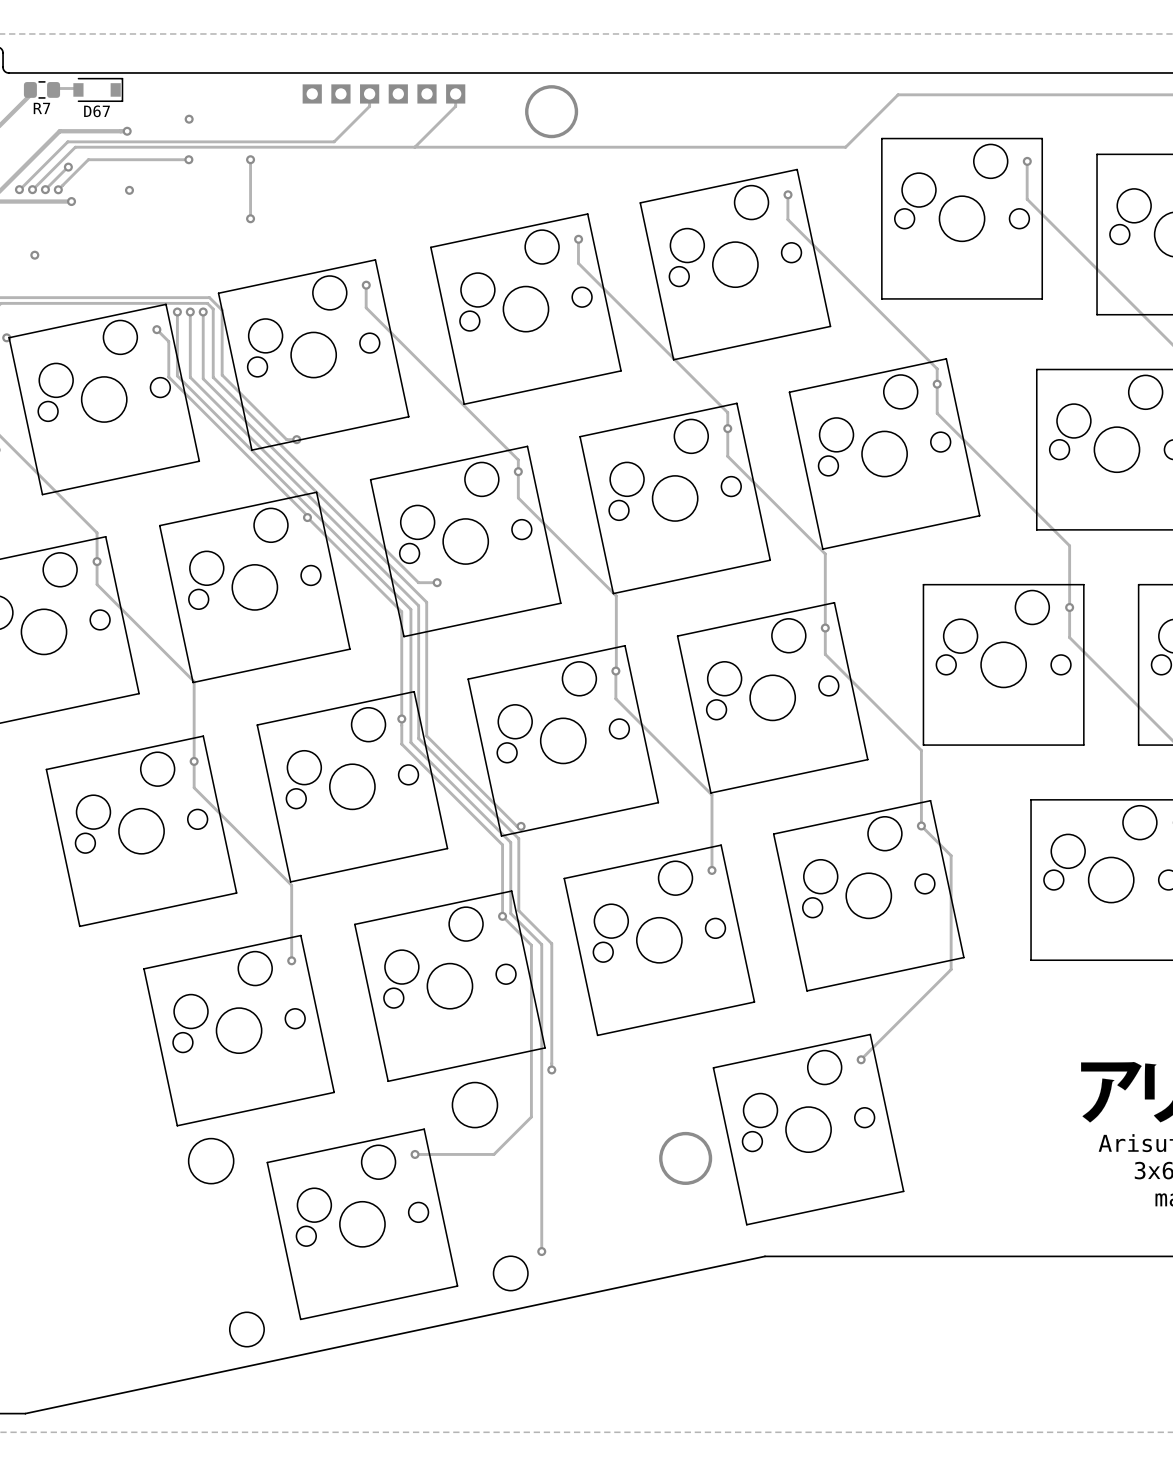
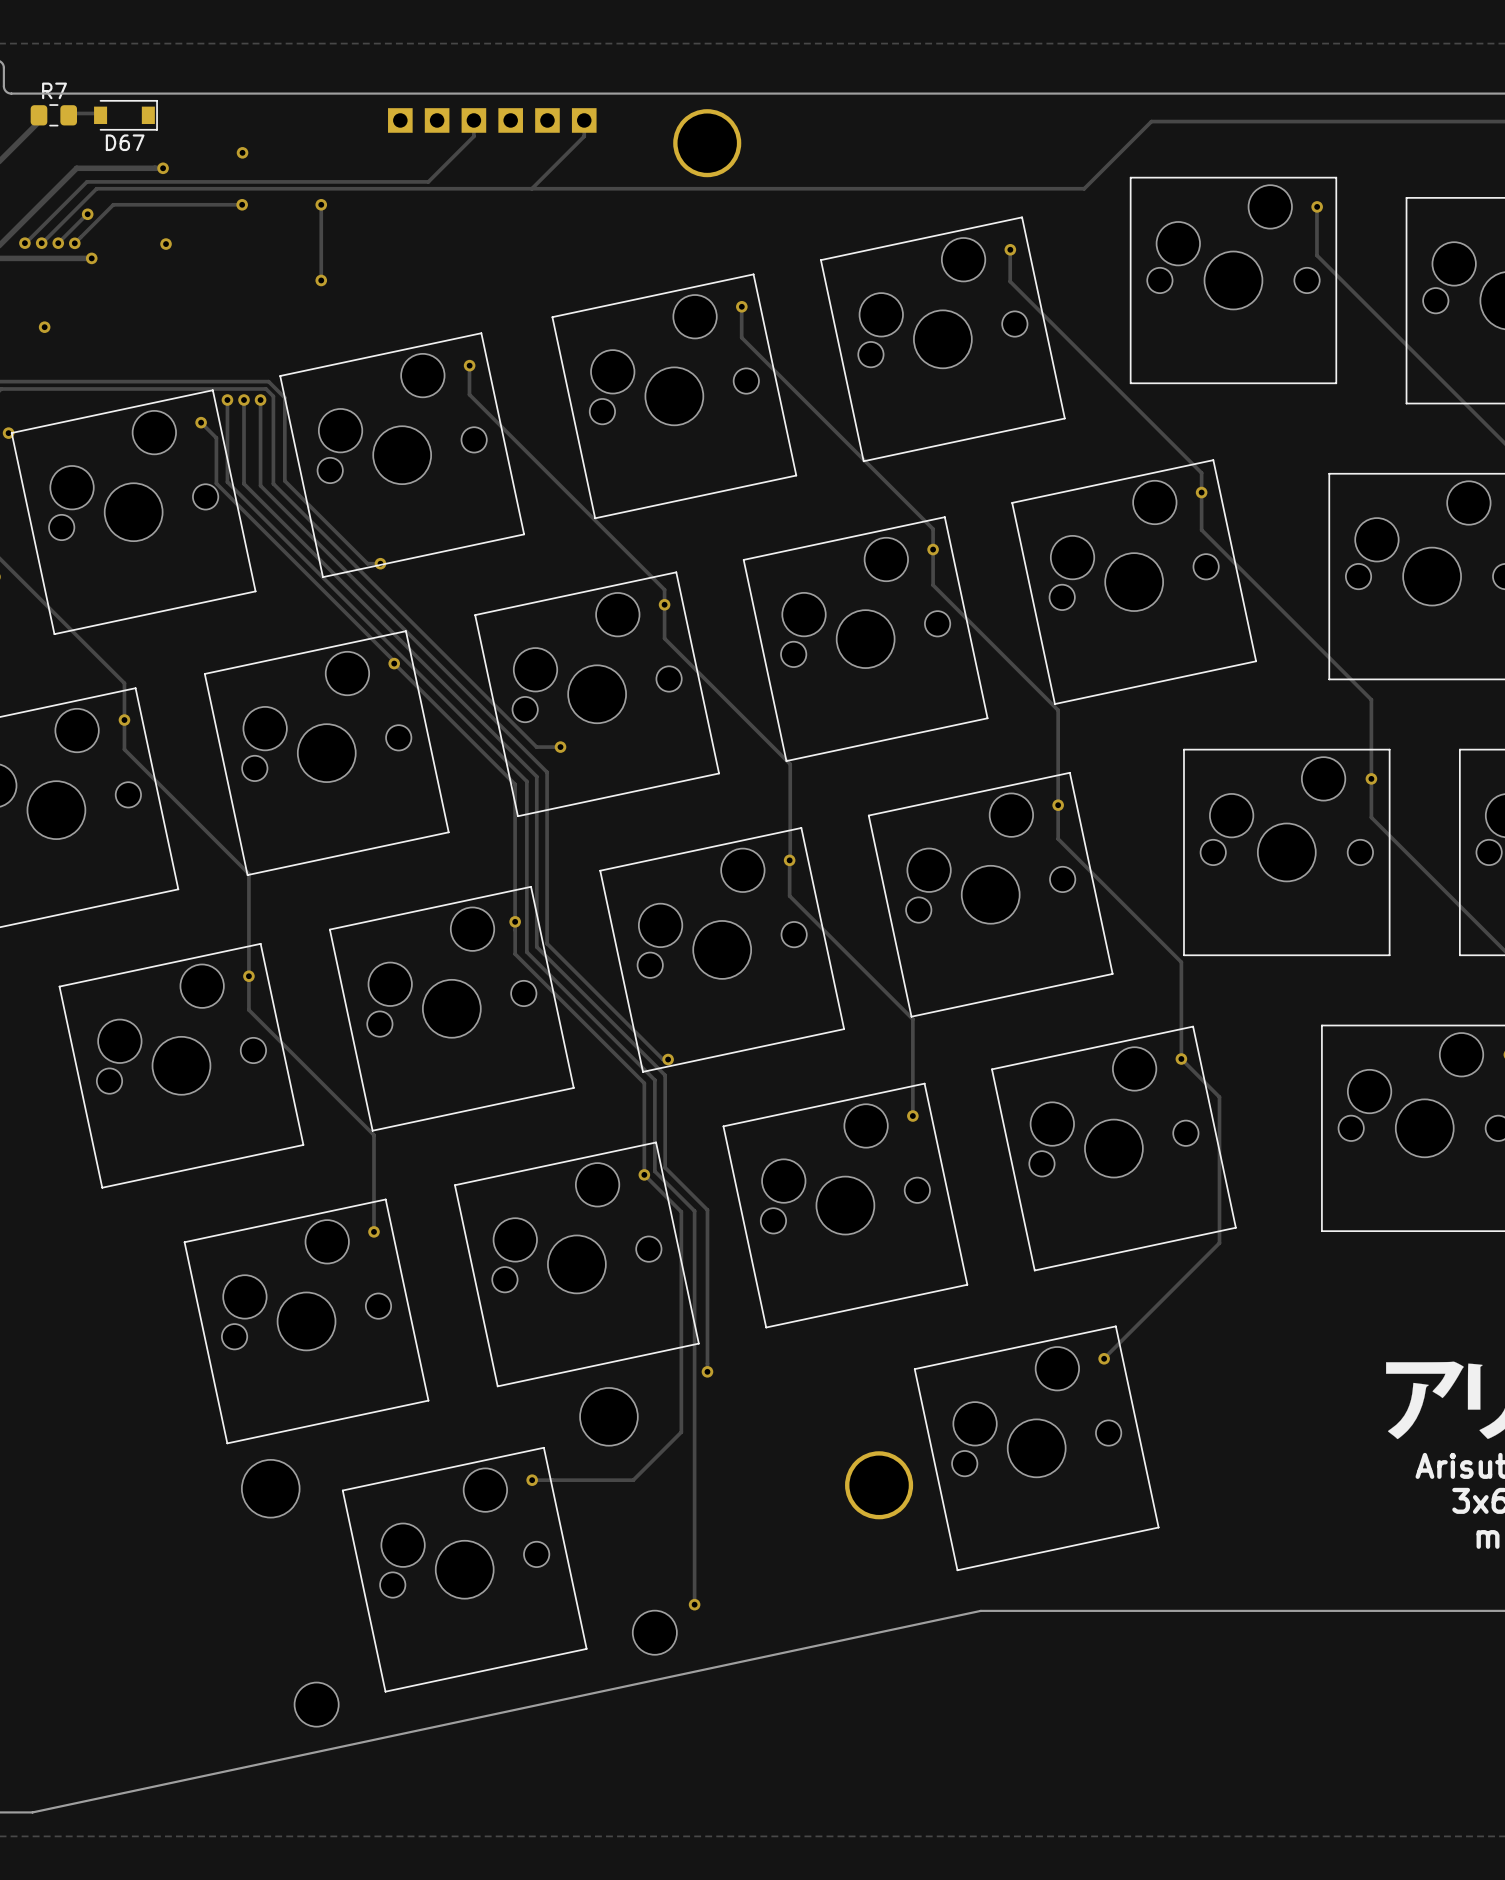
R7 name position: R7 (41, 108) -> R7 (54, 90)

